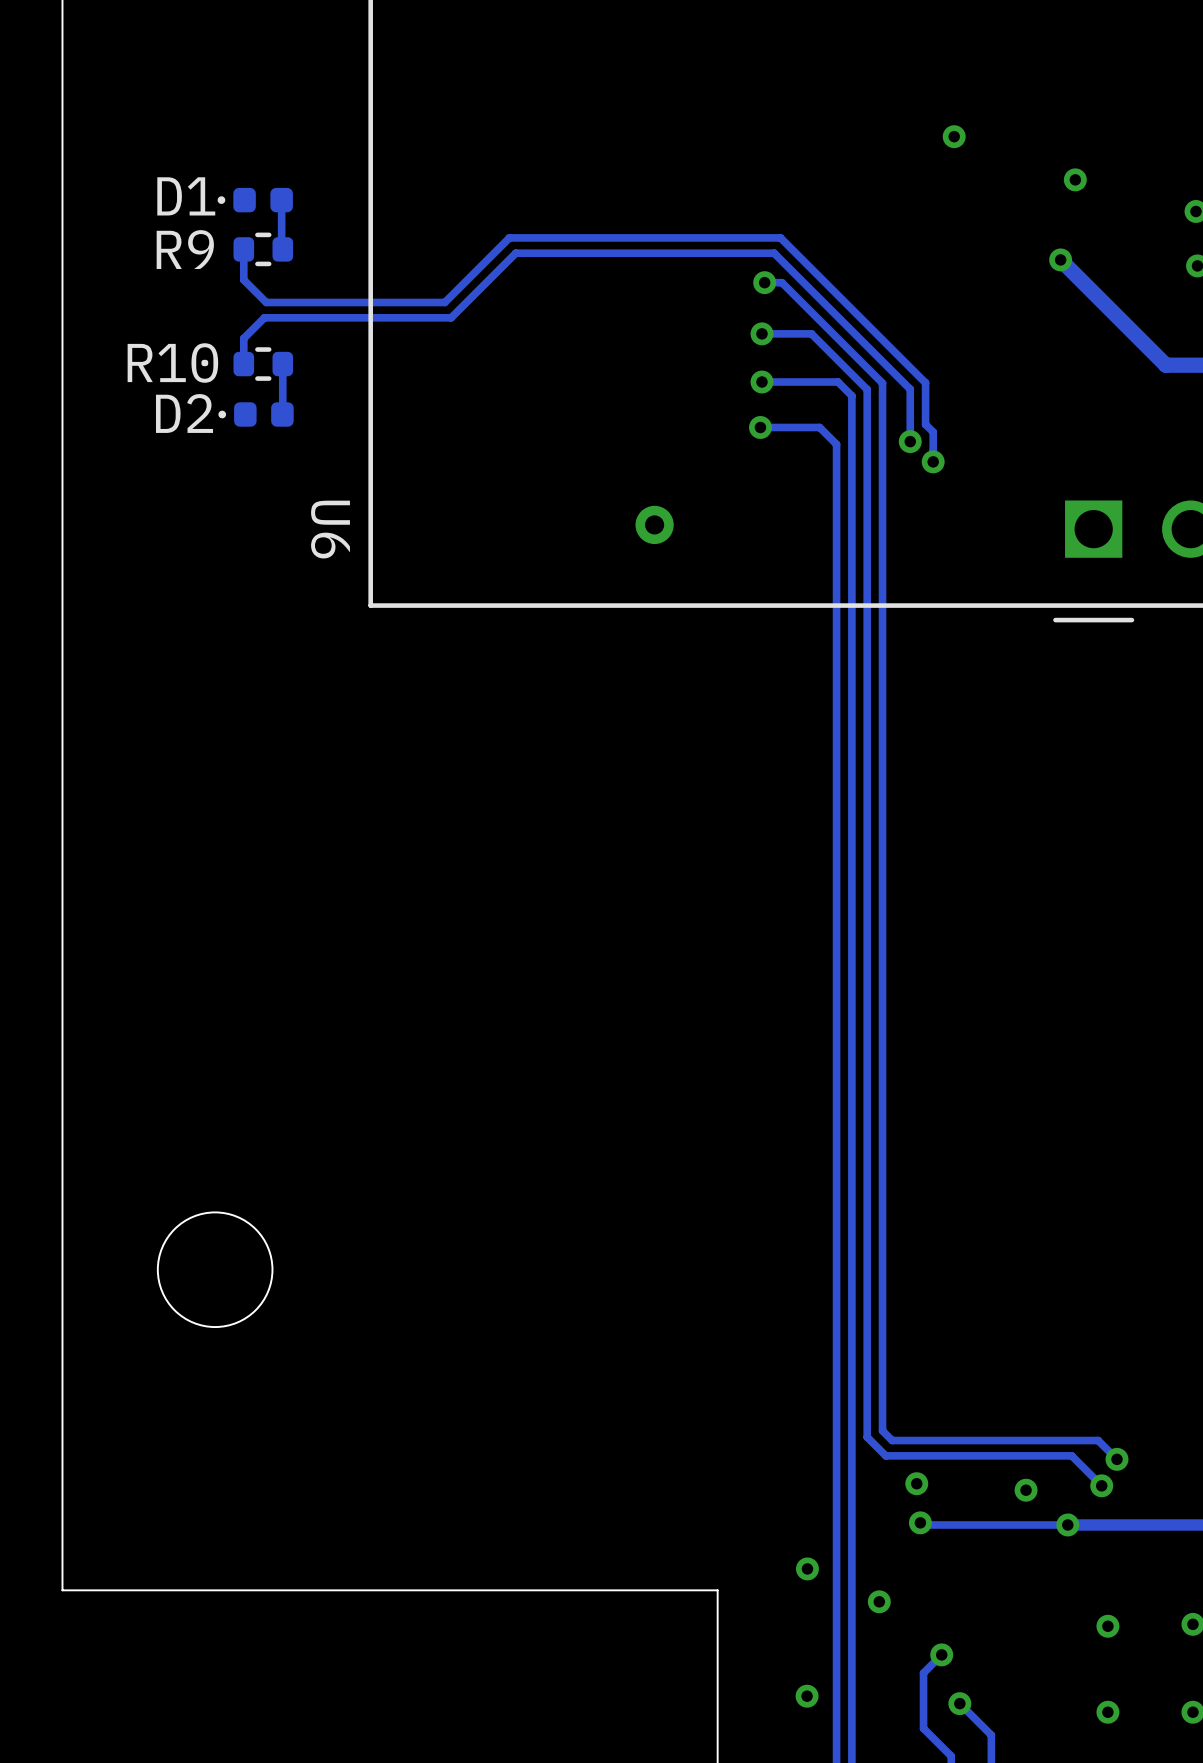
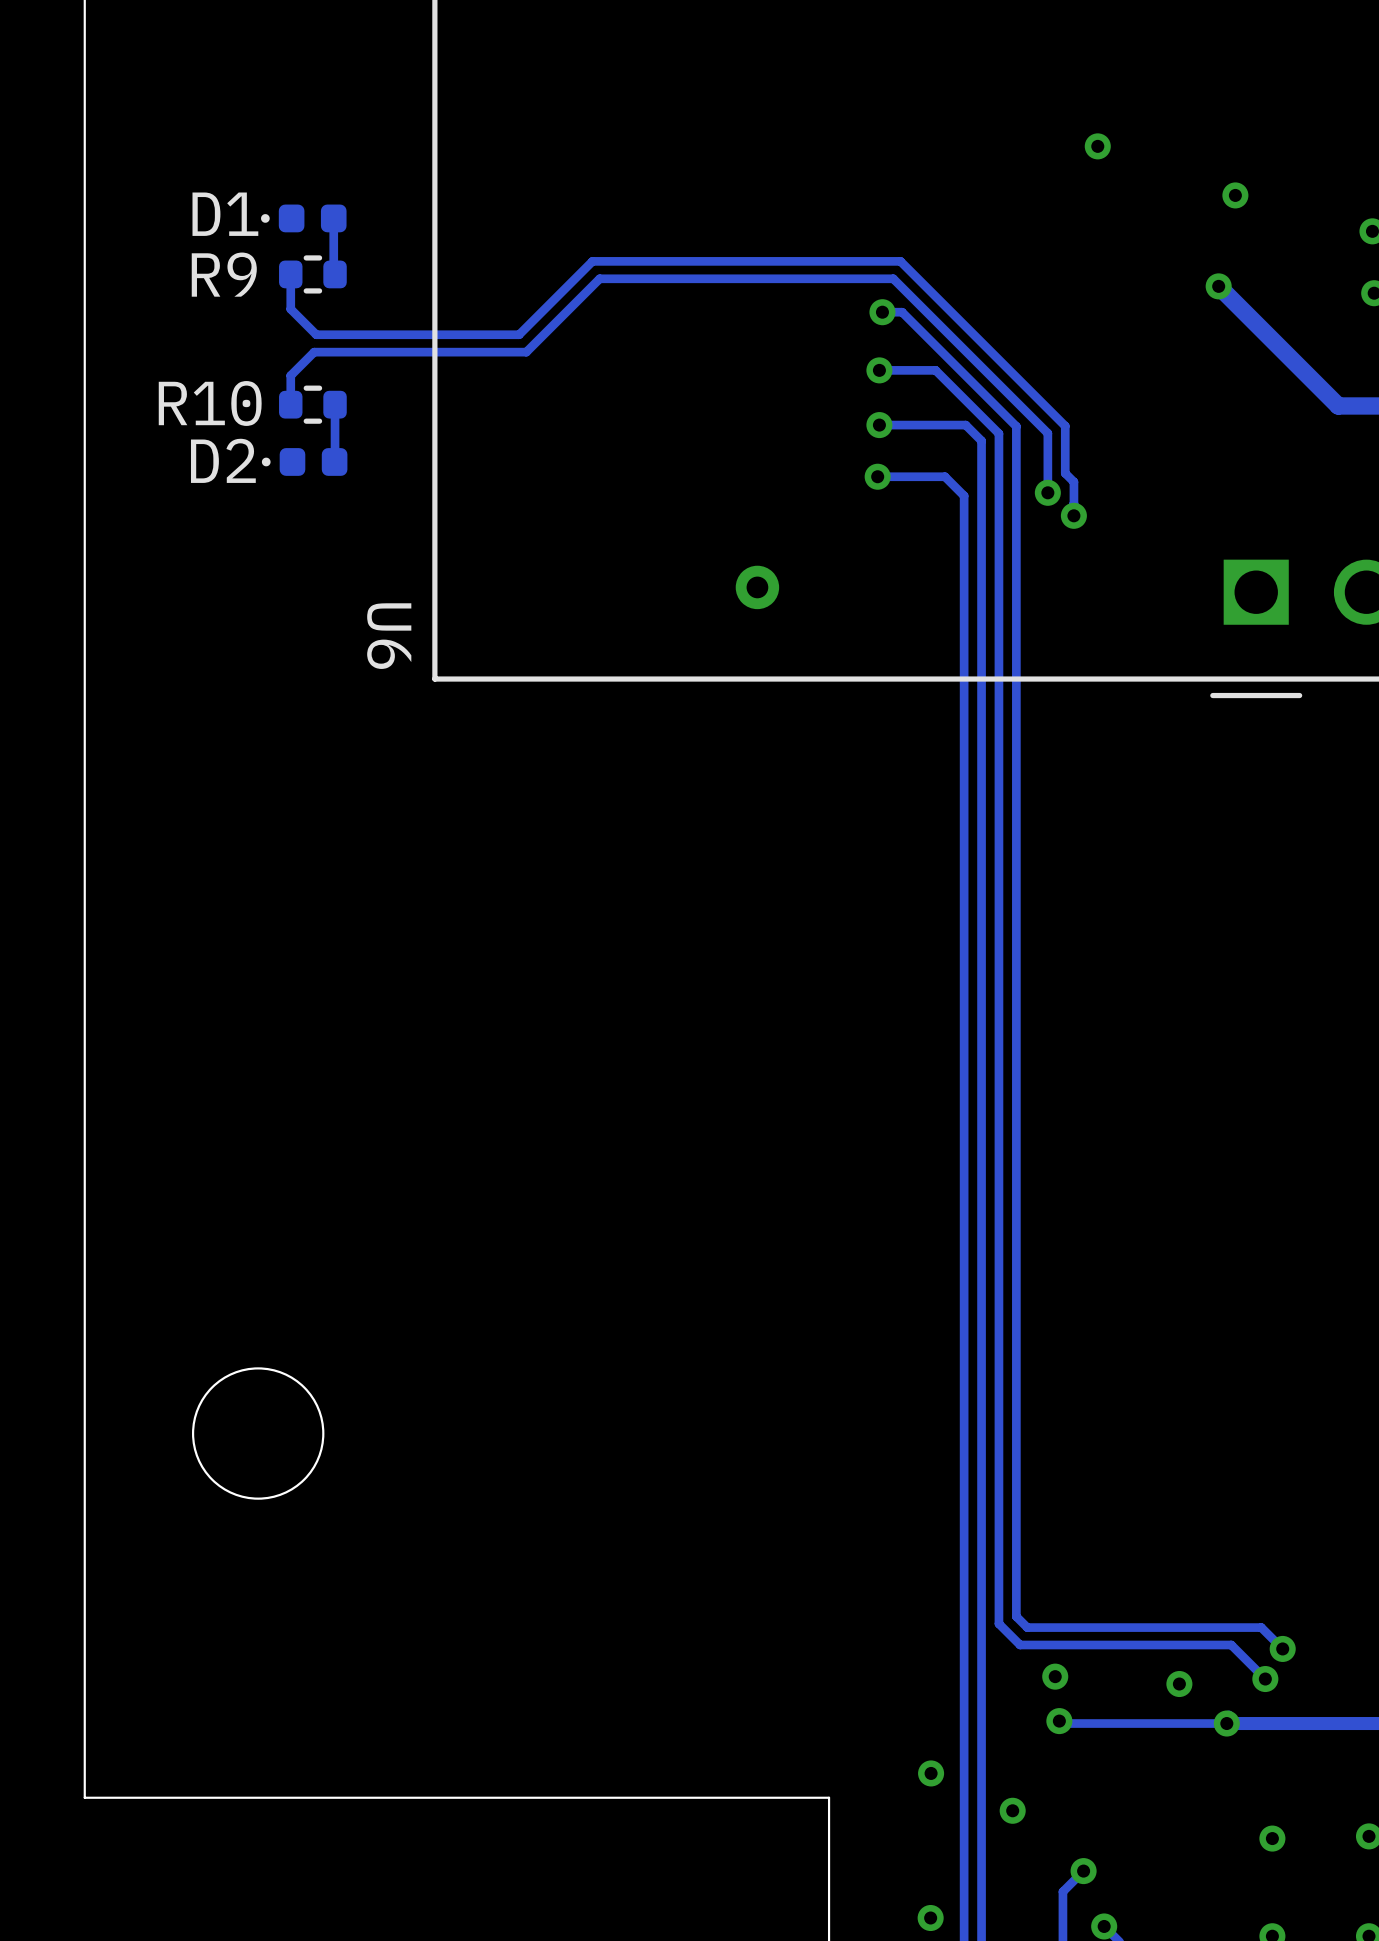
U6 name position: U6 (330, 529) -> U6 (389, 636)

